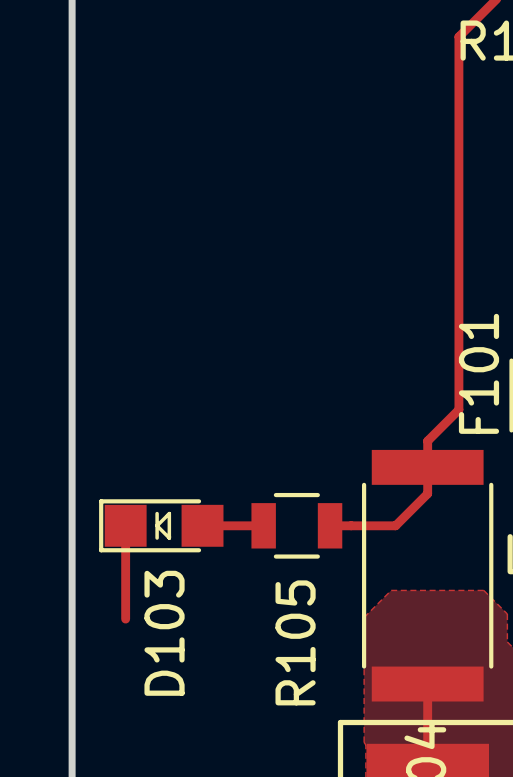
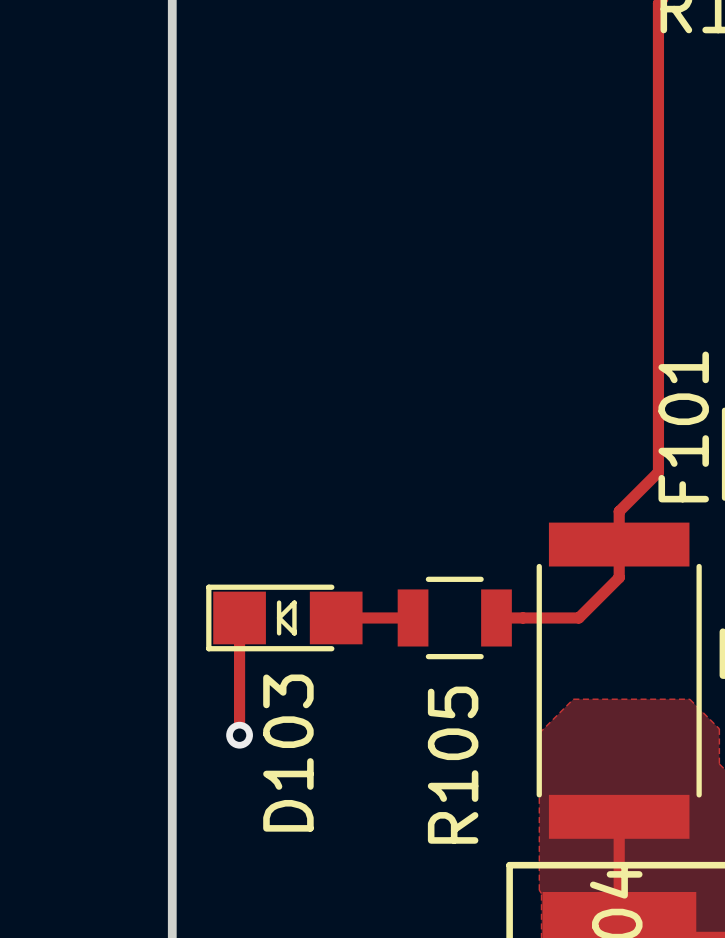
via: none -> (239, 735)

